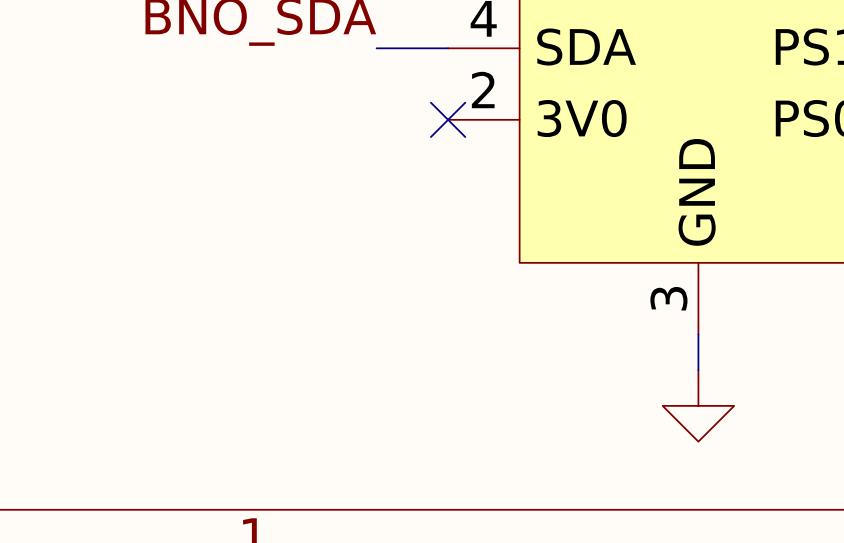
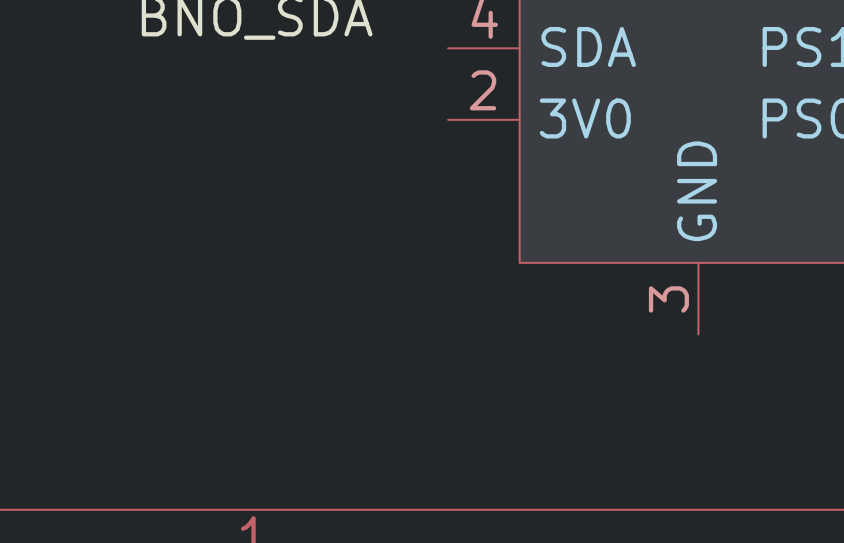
wire: (376, 48) (448, 48) -> none
no-connect mark: (448, 119) -> none
wire: (698, 334) (698, 370) -> none
power symbol: (698, 405) -> none

